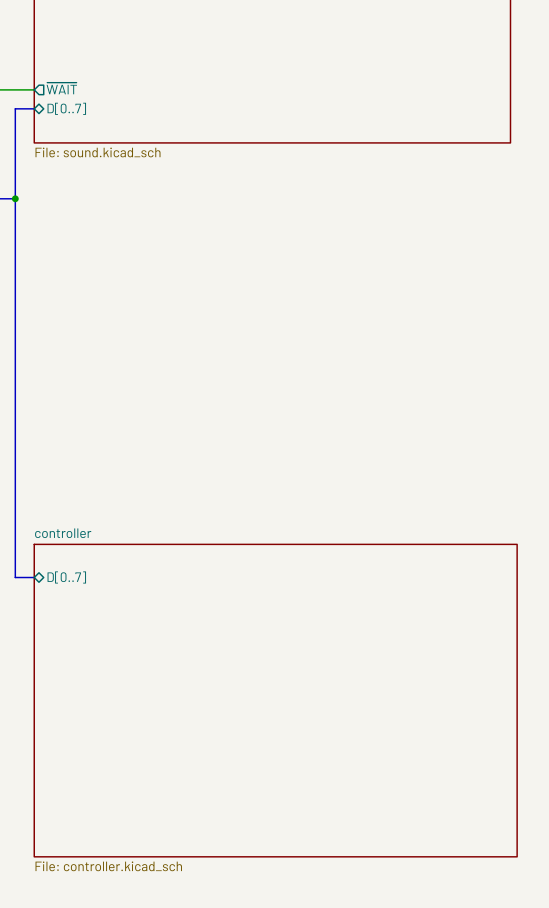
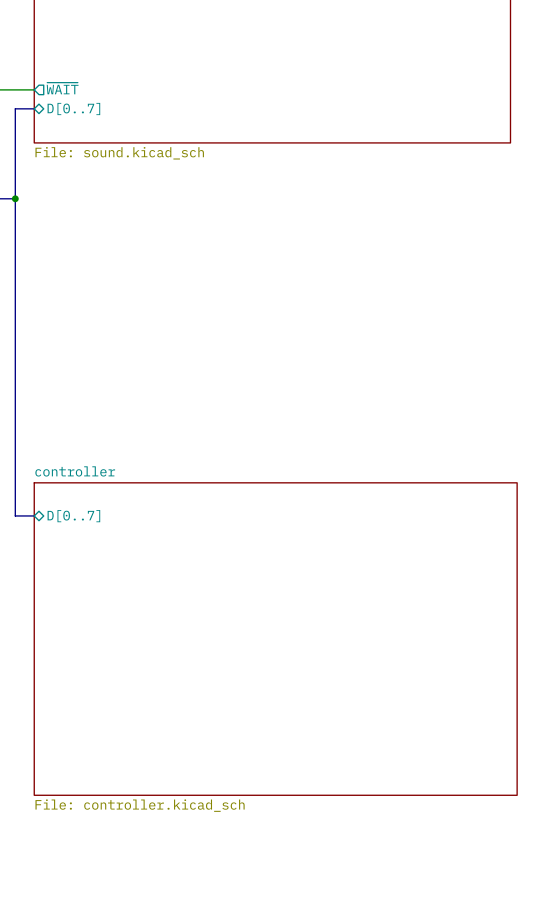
bus: (15, 515) (15, 577) (34, 577) -> (15, 515) (34, 515)
sheet pin position: D[0..7] (66, 577) -> D[0..7] (73, 516)
sheet controller position: (275, 700) -> (275, 639)

